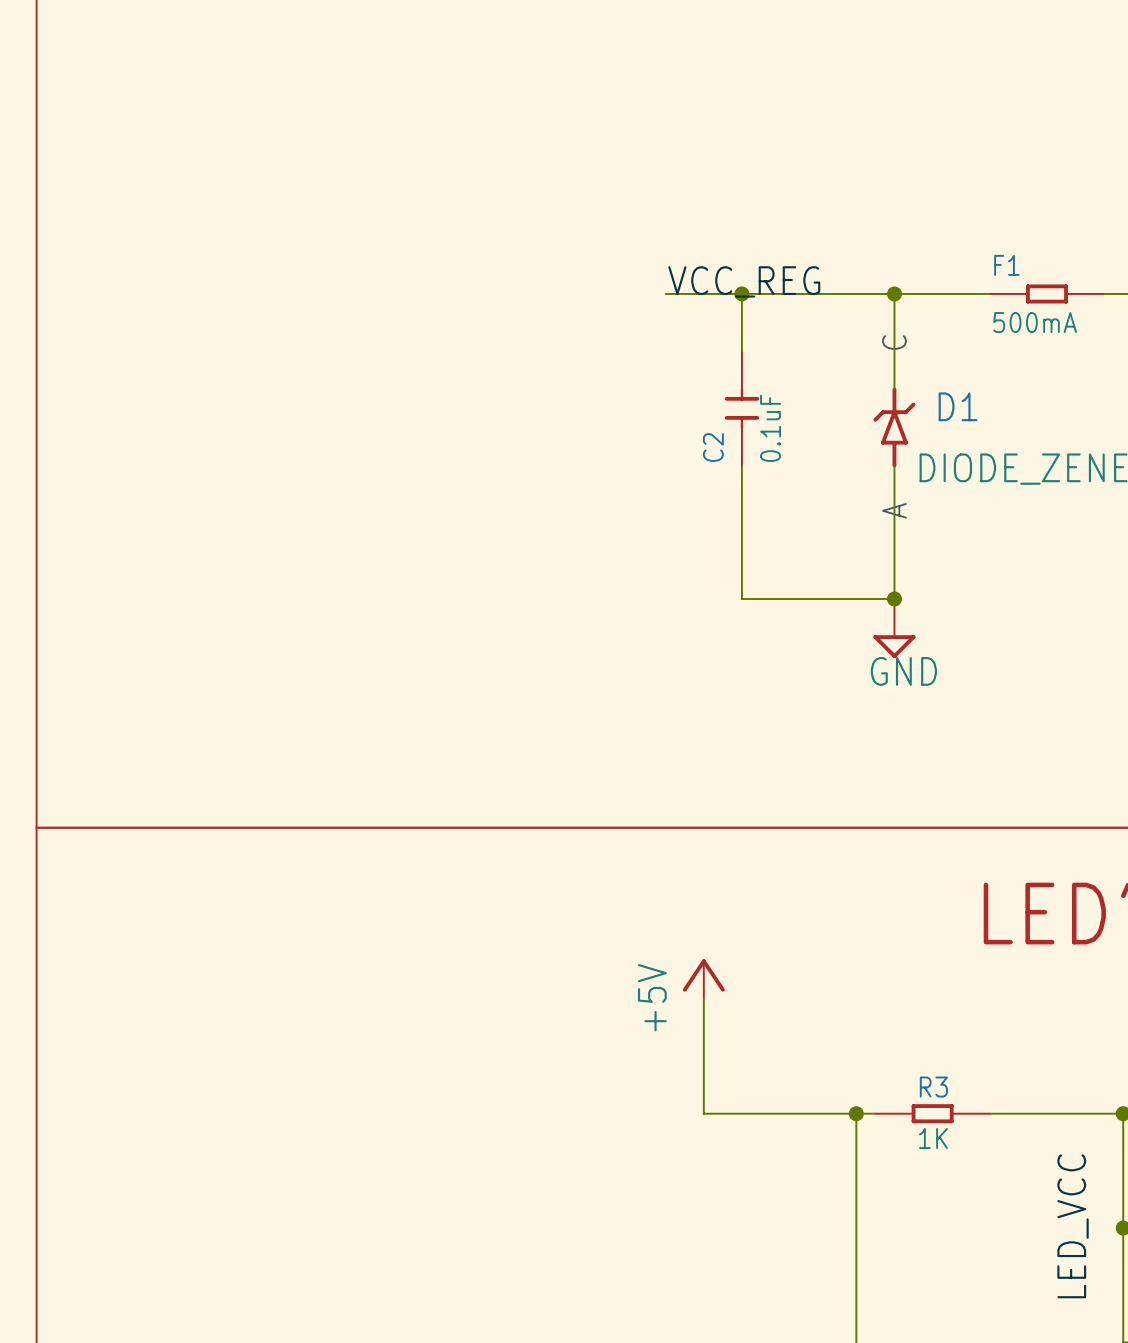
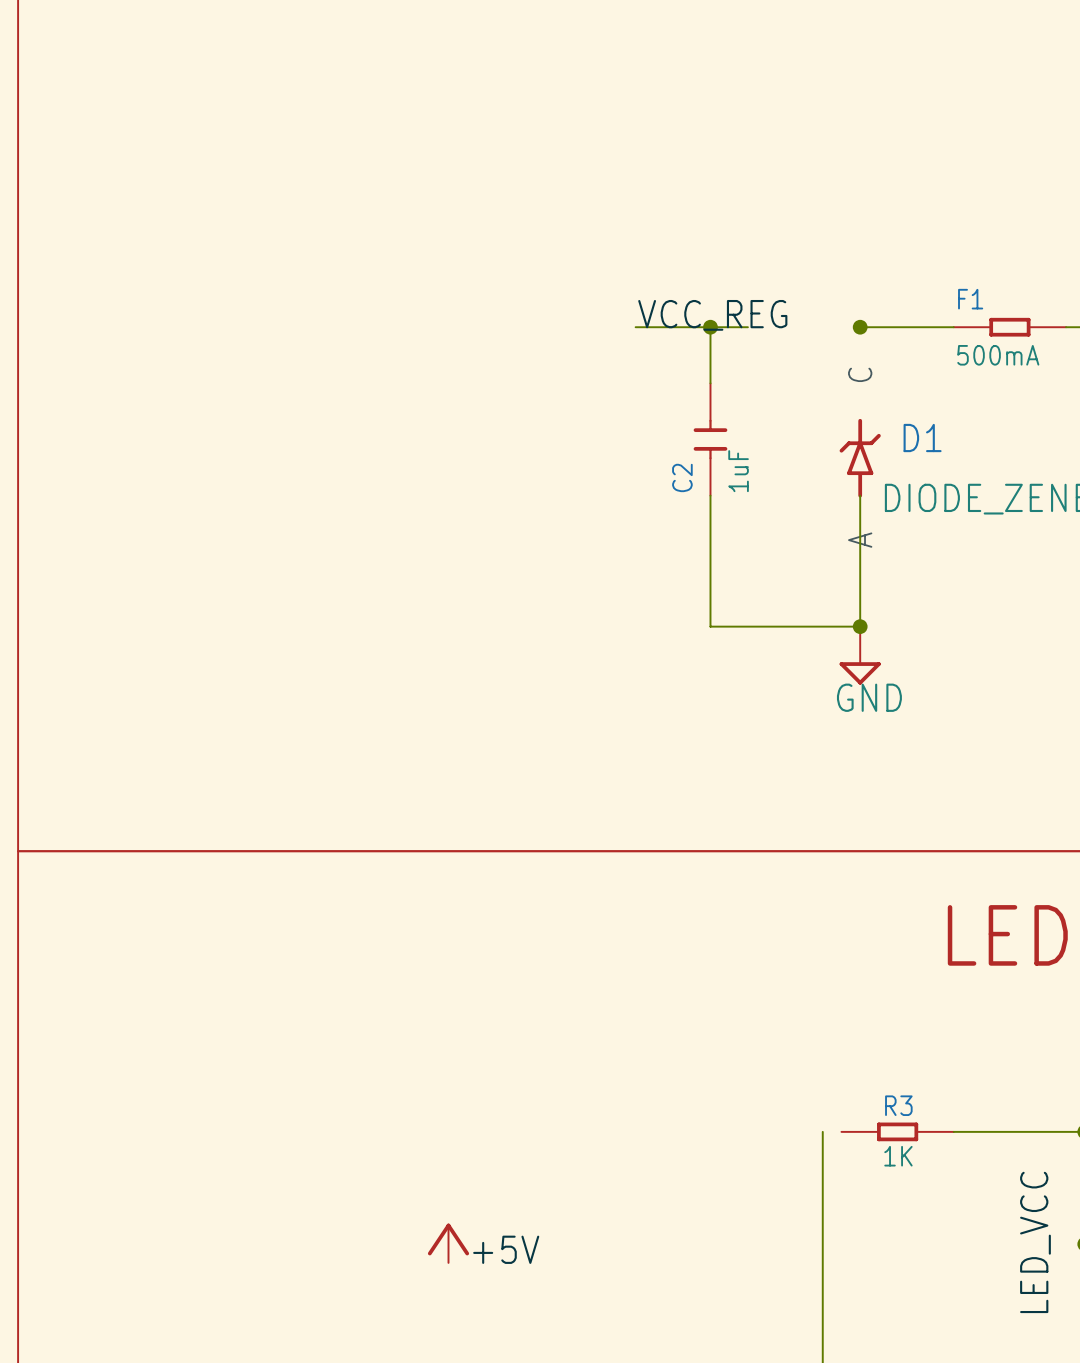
wire: (780, 293) (894, 293) (894, 389) -> none
C2 value: 0.1uF (770, 428) -> 1uF (738, 471)
power symbol: +5V (703, 979) -> none
wire: (703, 999) (703, 1113) (875, 1113) -> none
junction: (856, 1113) -> none
power symbol: none -> (448, 1243)
label: none -> +5V (506, 1249)

